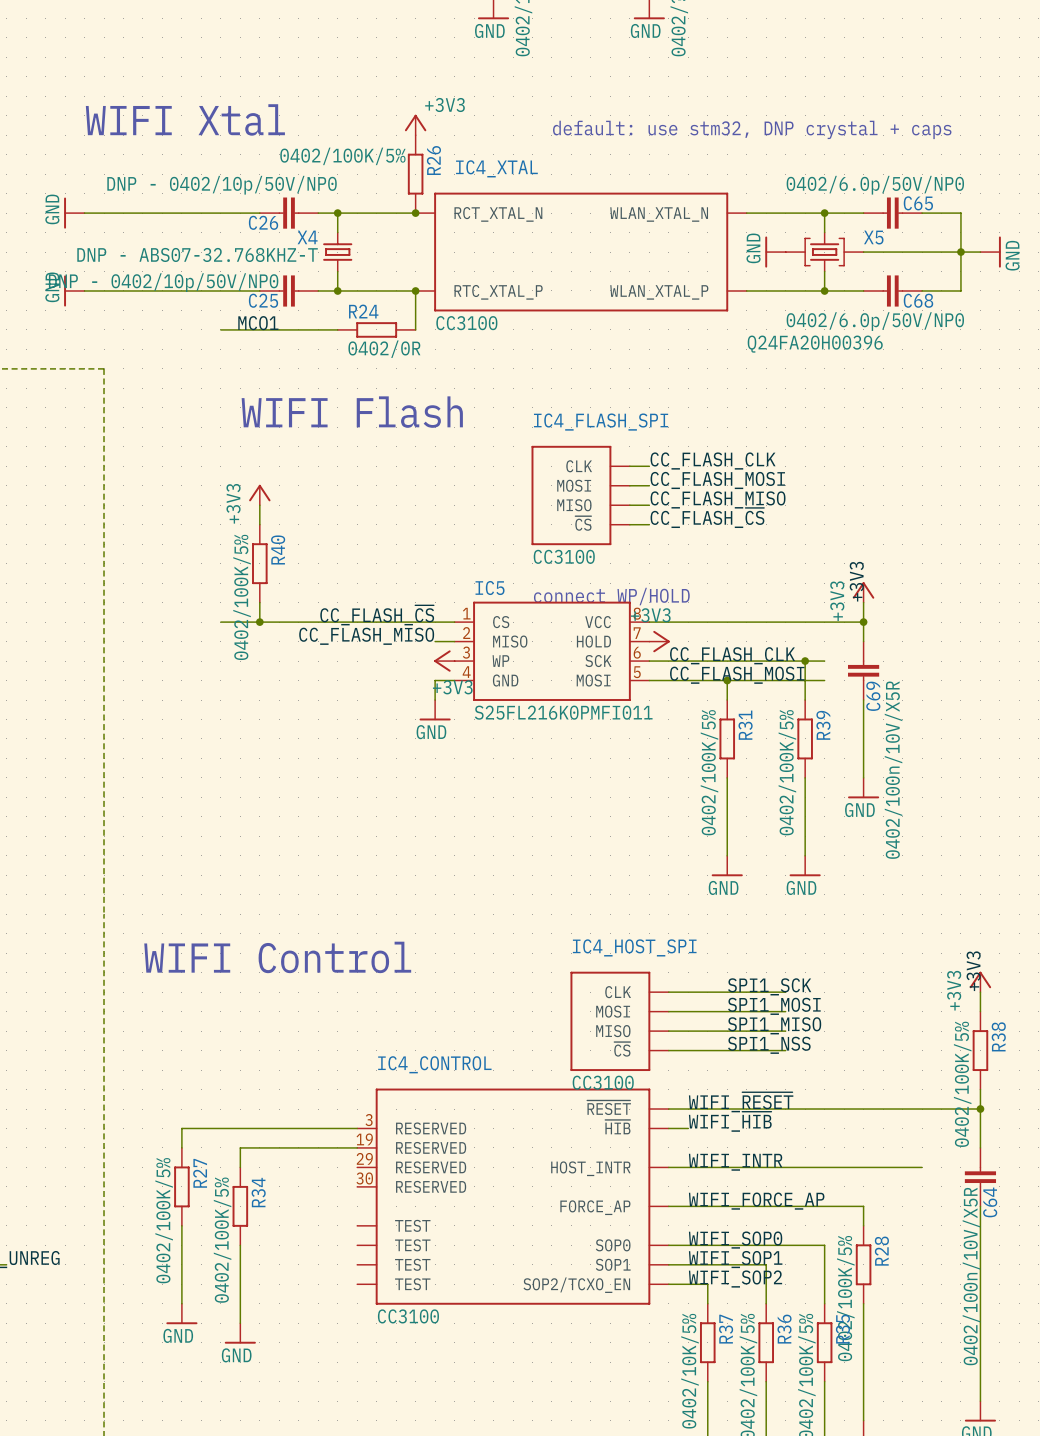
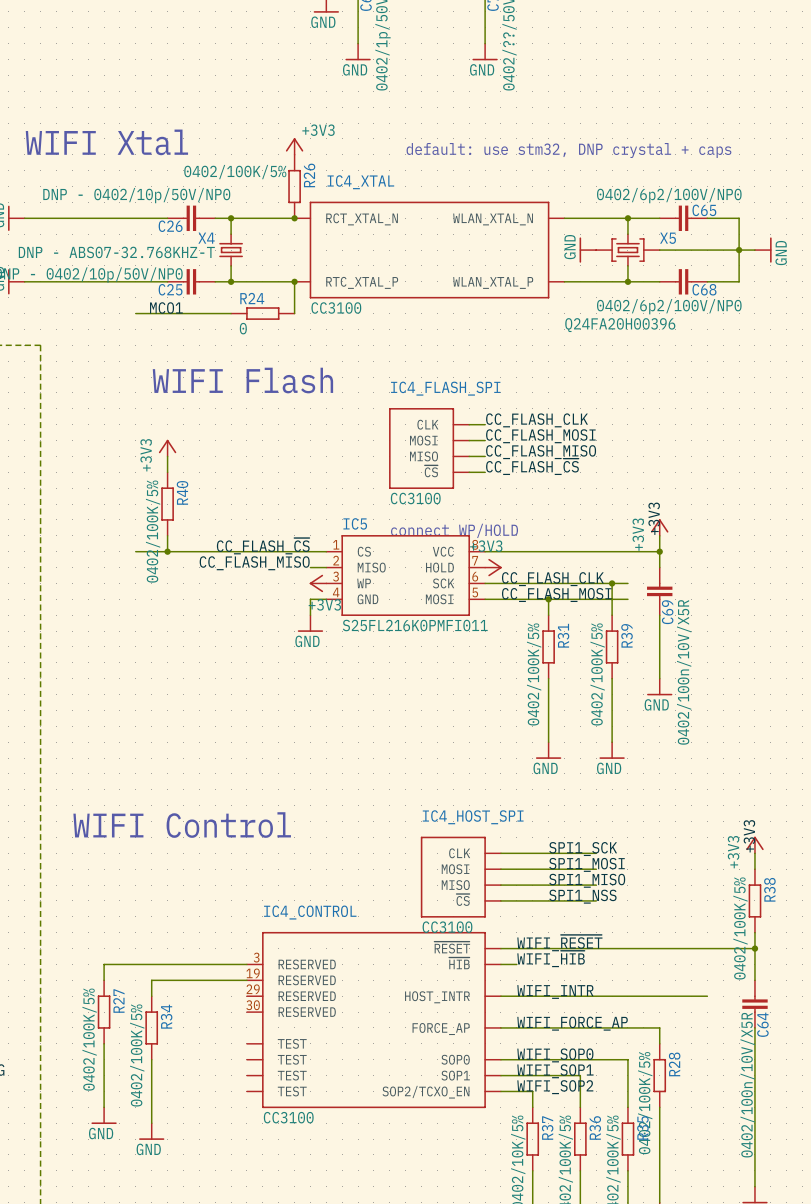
C65 value: 0402/6.0p/50V/NP0 (875, 185) -> 0402/6p2/100V/NP0 (669, 195)
C68 value: 0402/6.0p/50V/NP0 (875, 321) -> 0402/6p2/100V/NP0 (669, 306)
R24 value: 0402/0R (384, 349) -> 0 (243, 328)

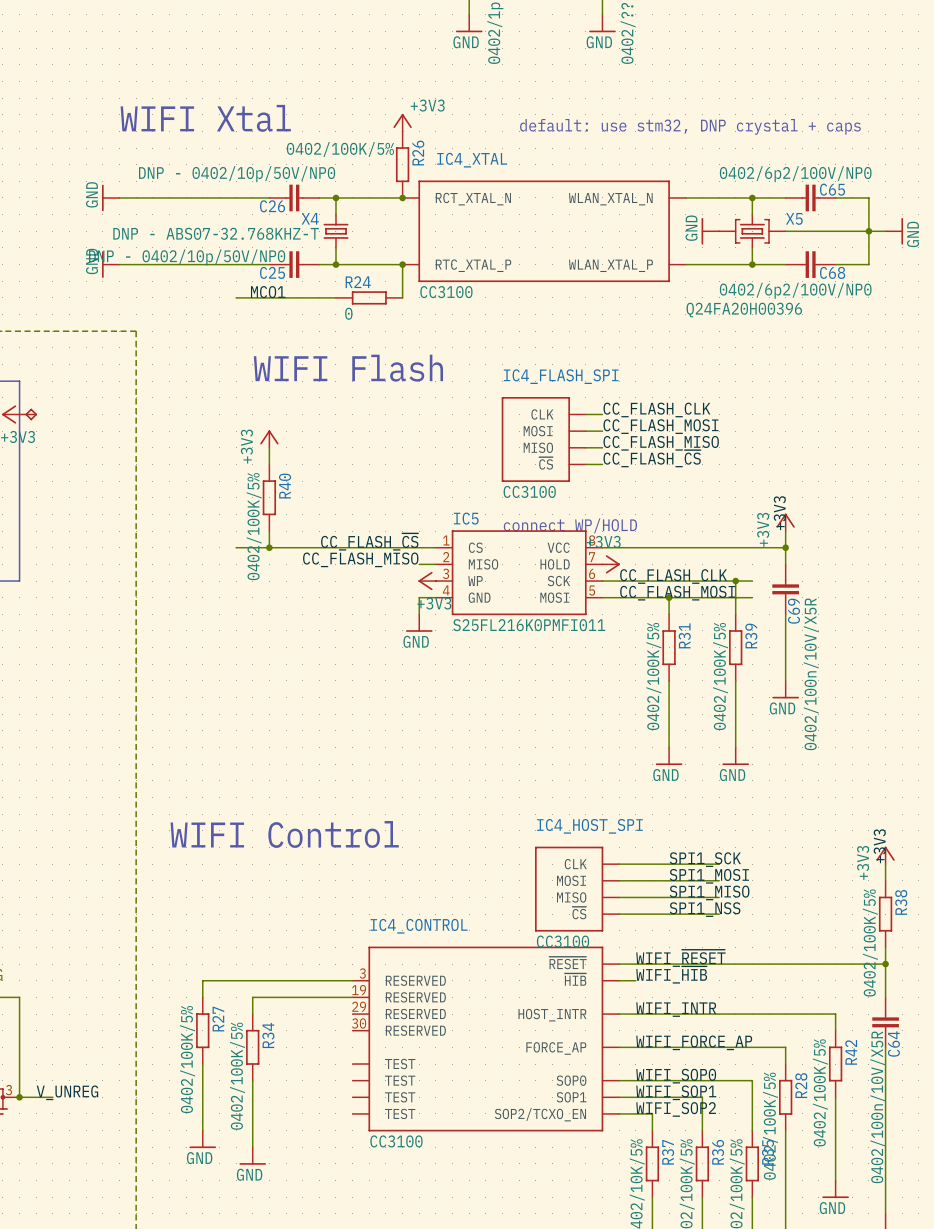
wire: none -> (835, 1014) (835, 1030)
R42: none -> 0402/100K/5% (835, 1064)
wire: none -> (835, 1097) (835, 1180)
power symbol: none -> GND (835, 1189)

